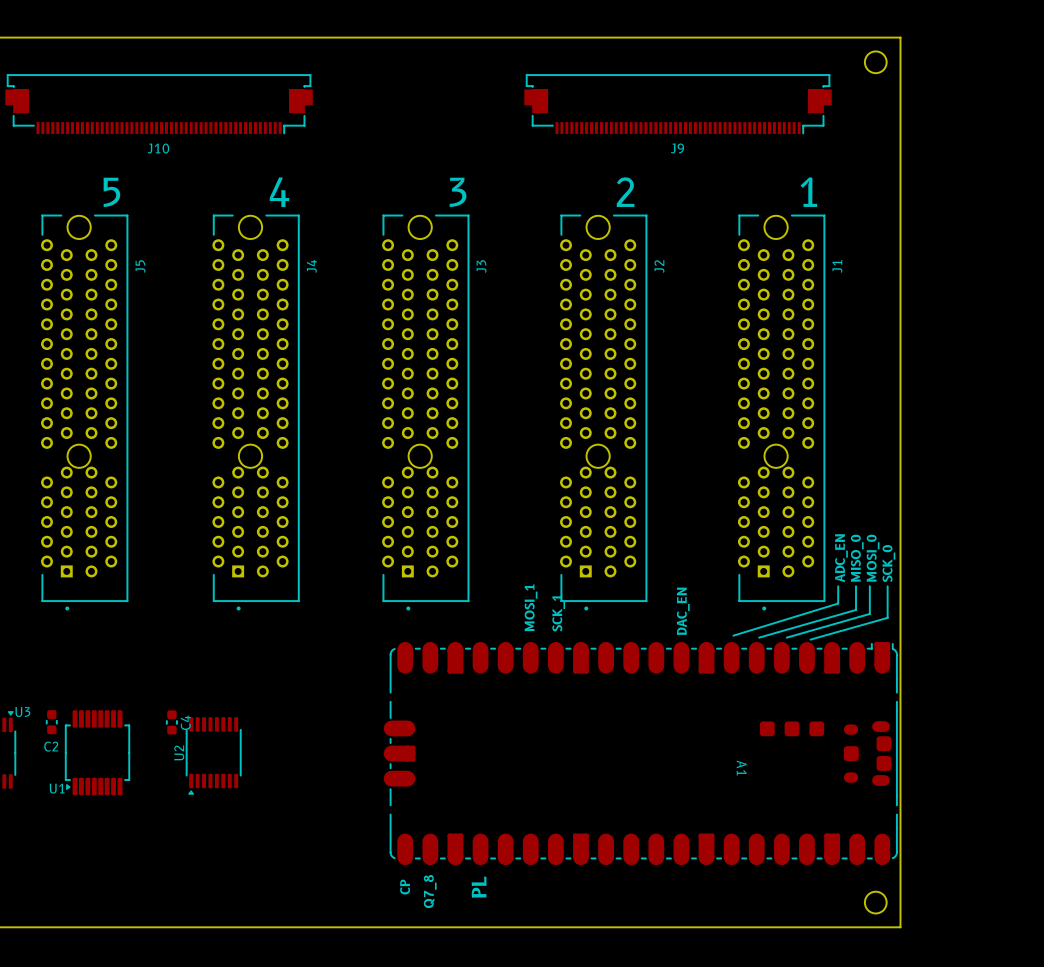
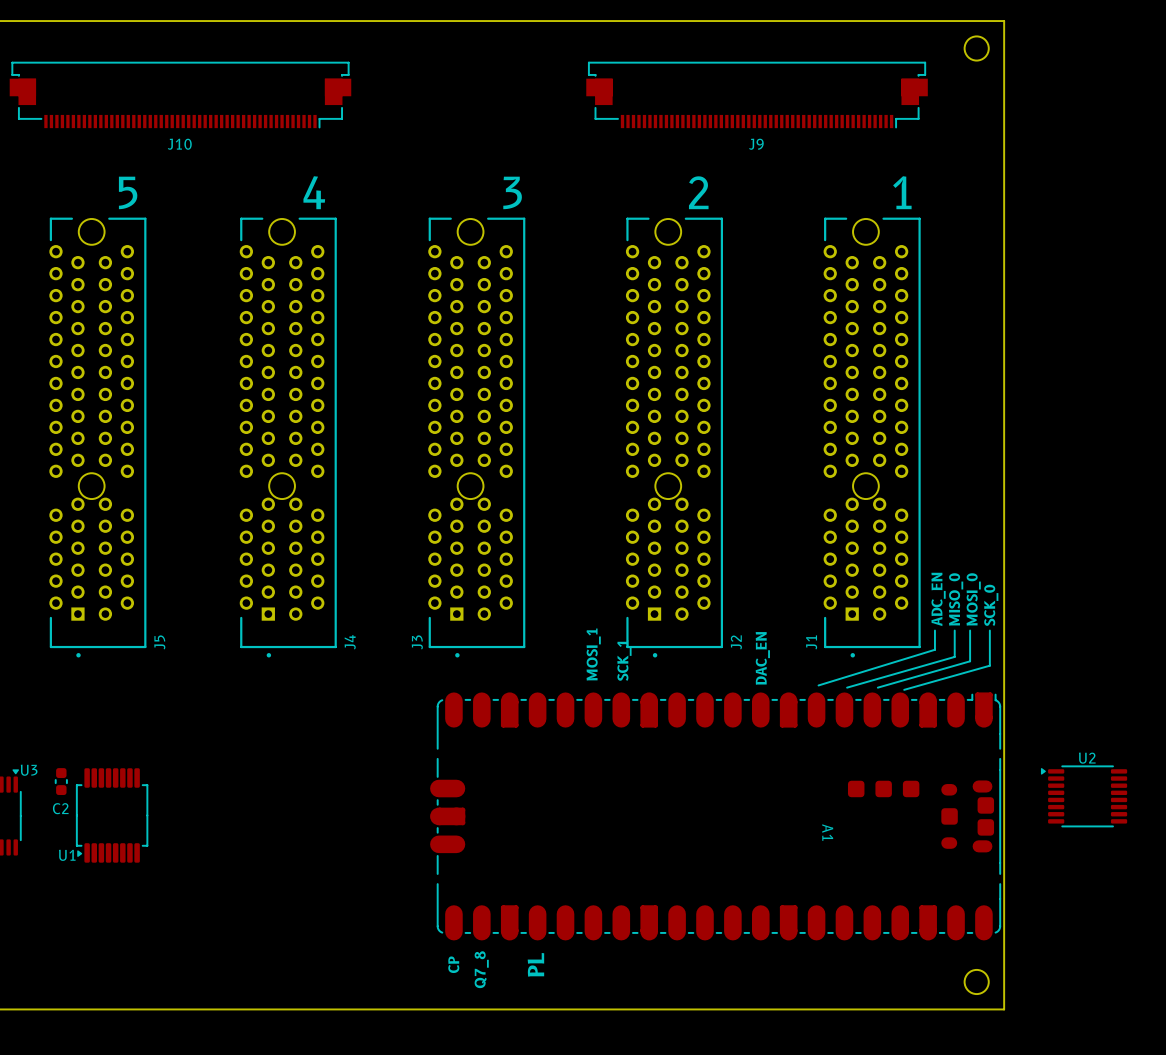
J5 name position: J5 (140, 266) -> J5 (159, 642)
J4 name position: J4 (311, 266) -> J4 (350, 642)
J3 name position: J3 (481, 266) -> J3 (417, 642)
J2 name position: J2 (659, 266) -> J2 (736, 642)
J1 name position: J1 (837, 266) -> J1 (811, 642)
C4: (171, 722) -> none
U2 rotation: 0° (213, 755) -> 90° clockwise (1084, 796)
U2 position: (213, 755) -> (1084, 796)

